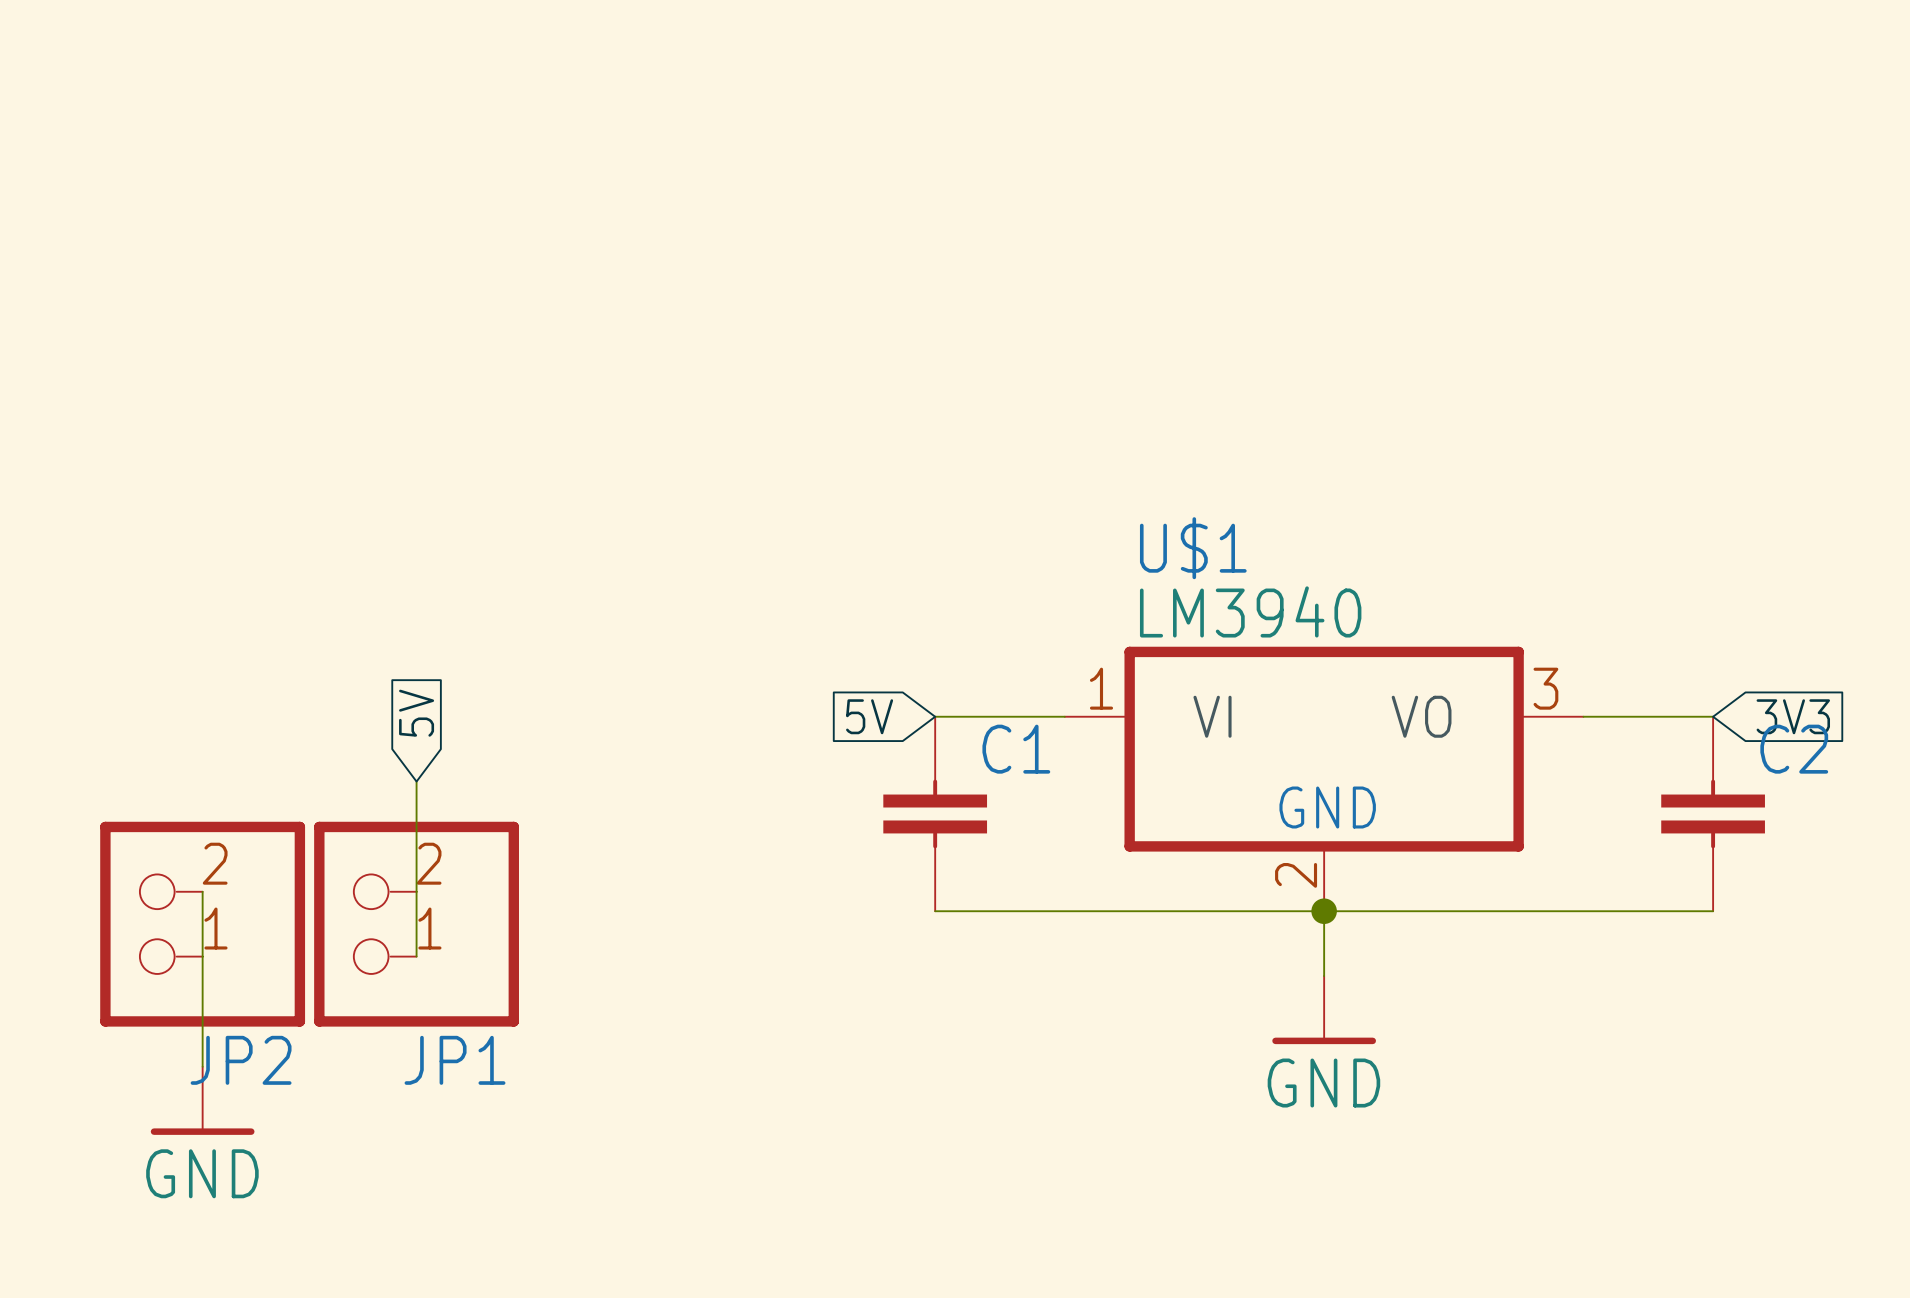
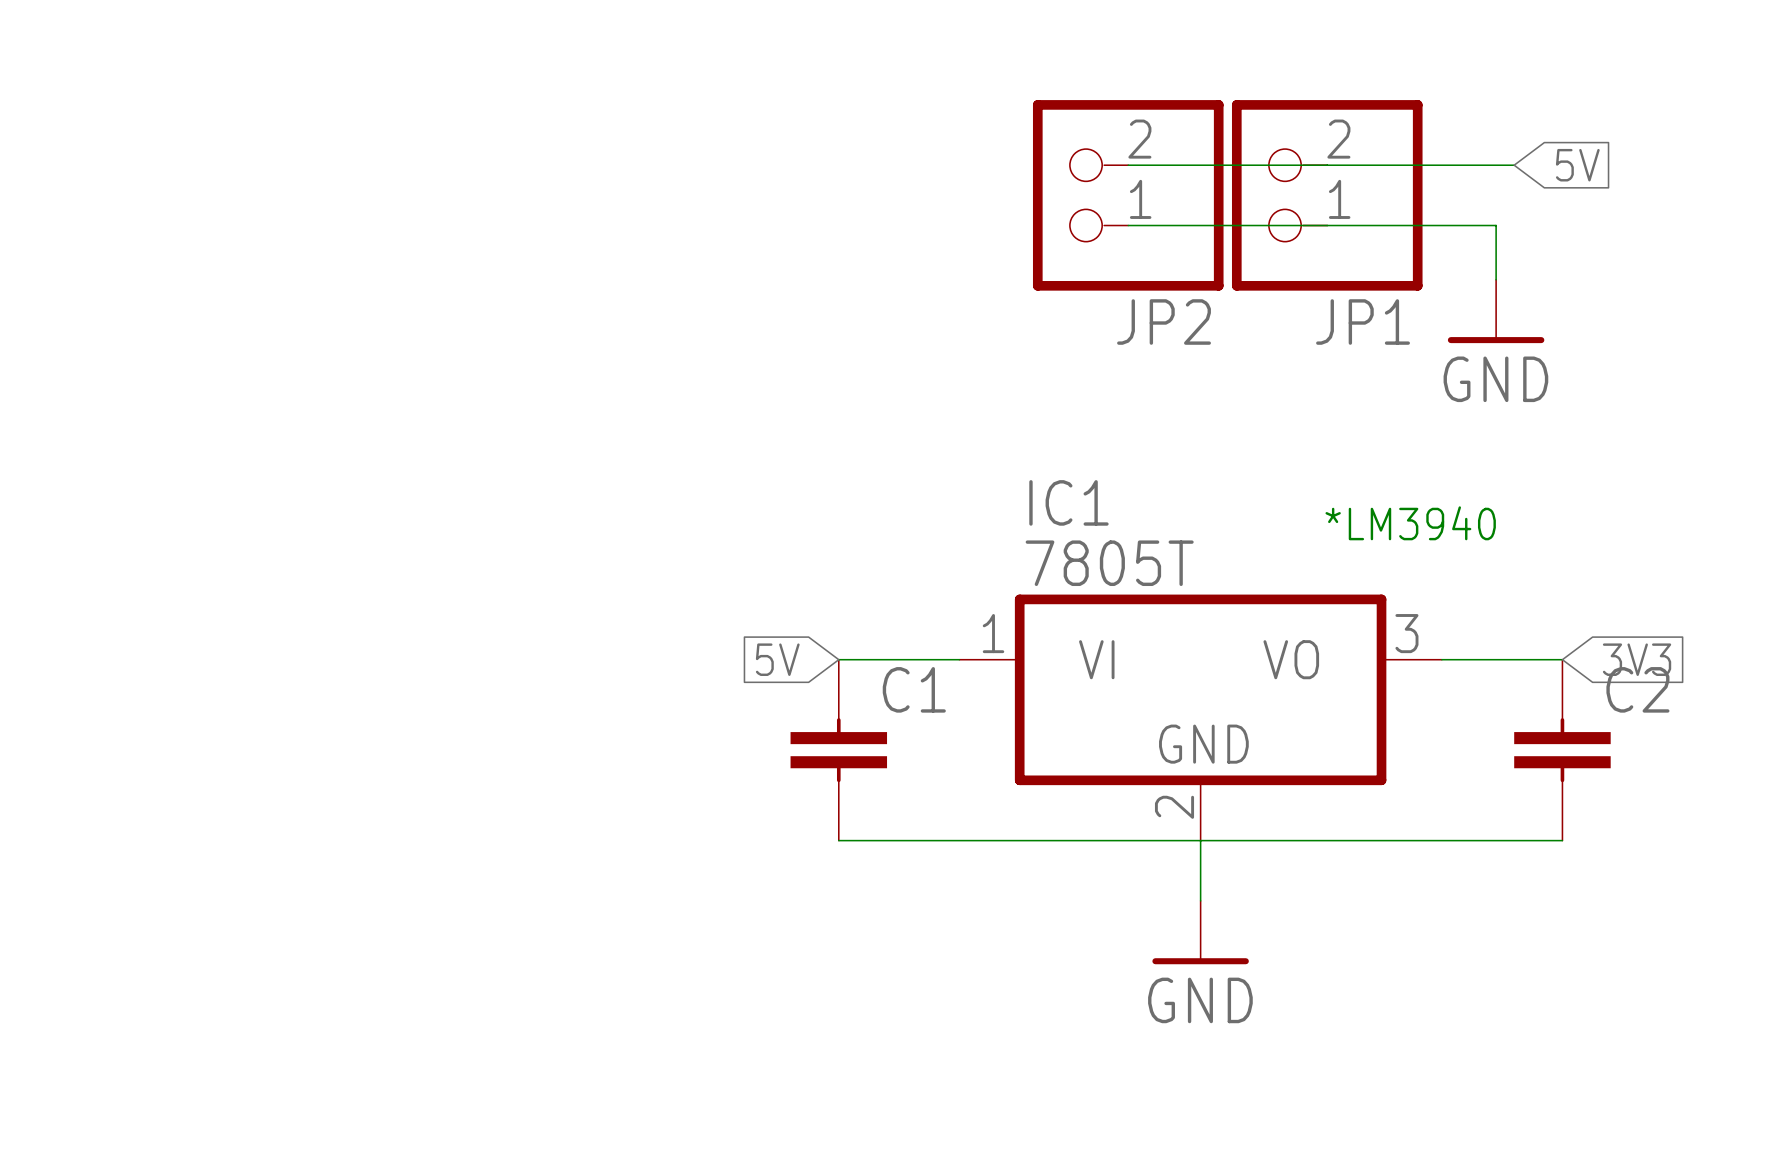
wire: none -> (1128, 165) (1514, 165)
global label: none -> 5V (1577, 165)
wire: none -> (1128, 225) (1496, 225) (1496, 279)
power symbol: none -> GND (1496, 311)
U$1 name: U$1 (1193, 548) -> IC1 (1068, 502)
text: none -> *LM3940 (1410, 523)
U$1 value: LM3940 (1250, 611) -> 7805T (1109, 563)
global label: 5V (416, 713) -> none
wire: (416, 781) (416, 956) -> none
wire: (202, 891) (202, 1066) -> none
junction: (1324, 911) -> none
JP2 position: (202, 924) -> (1128, 195)
JP1 position: (416, 924) -> (1327, 195)
power symbol: GND (202, 1100) -> none

